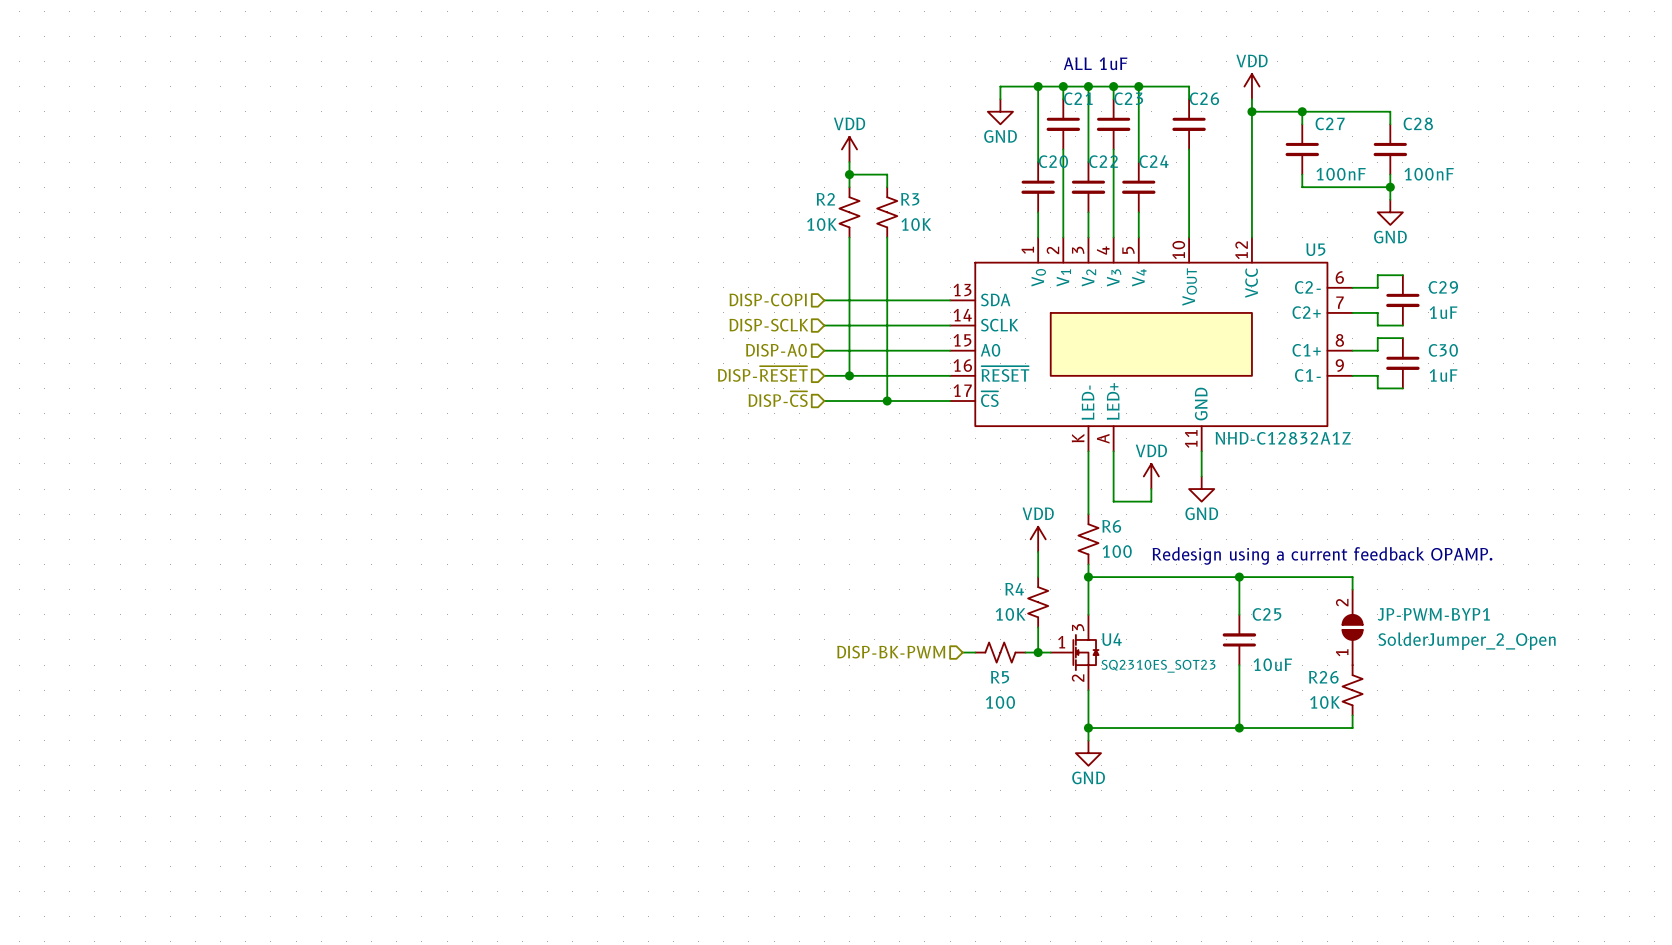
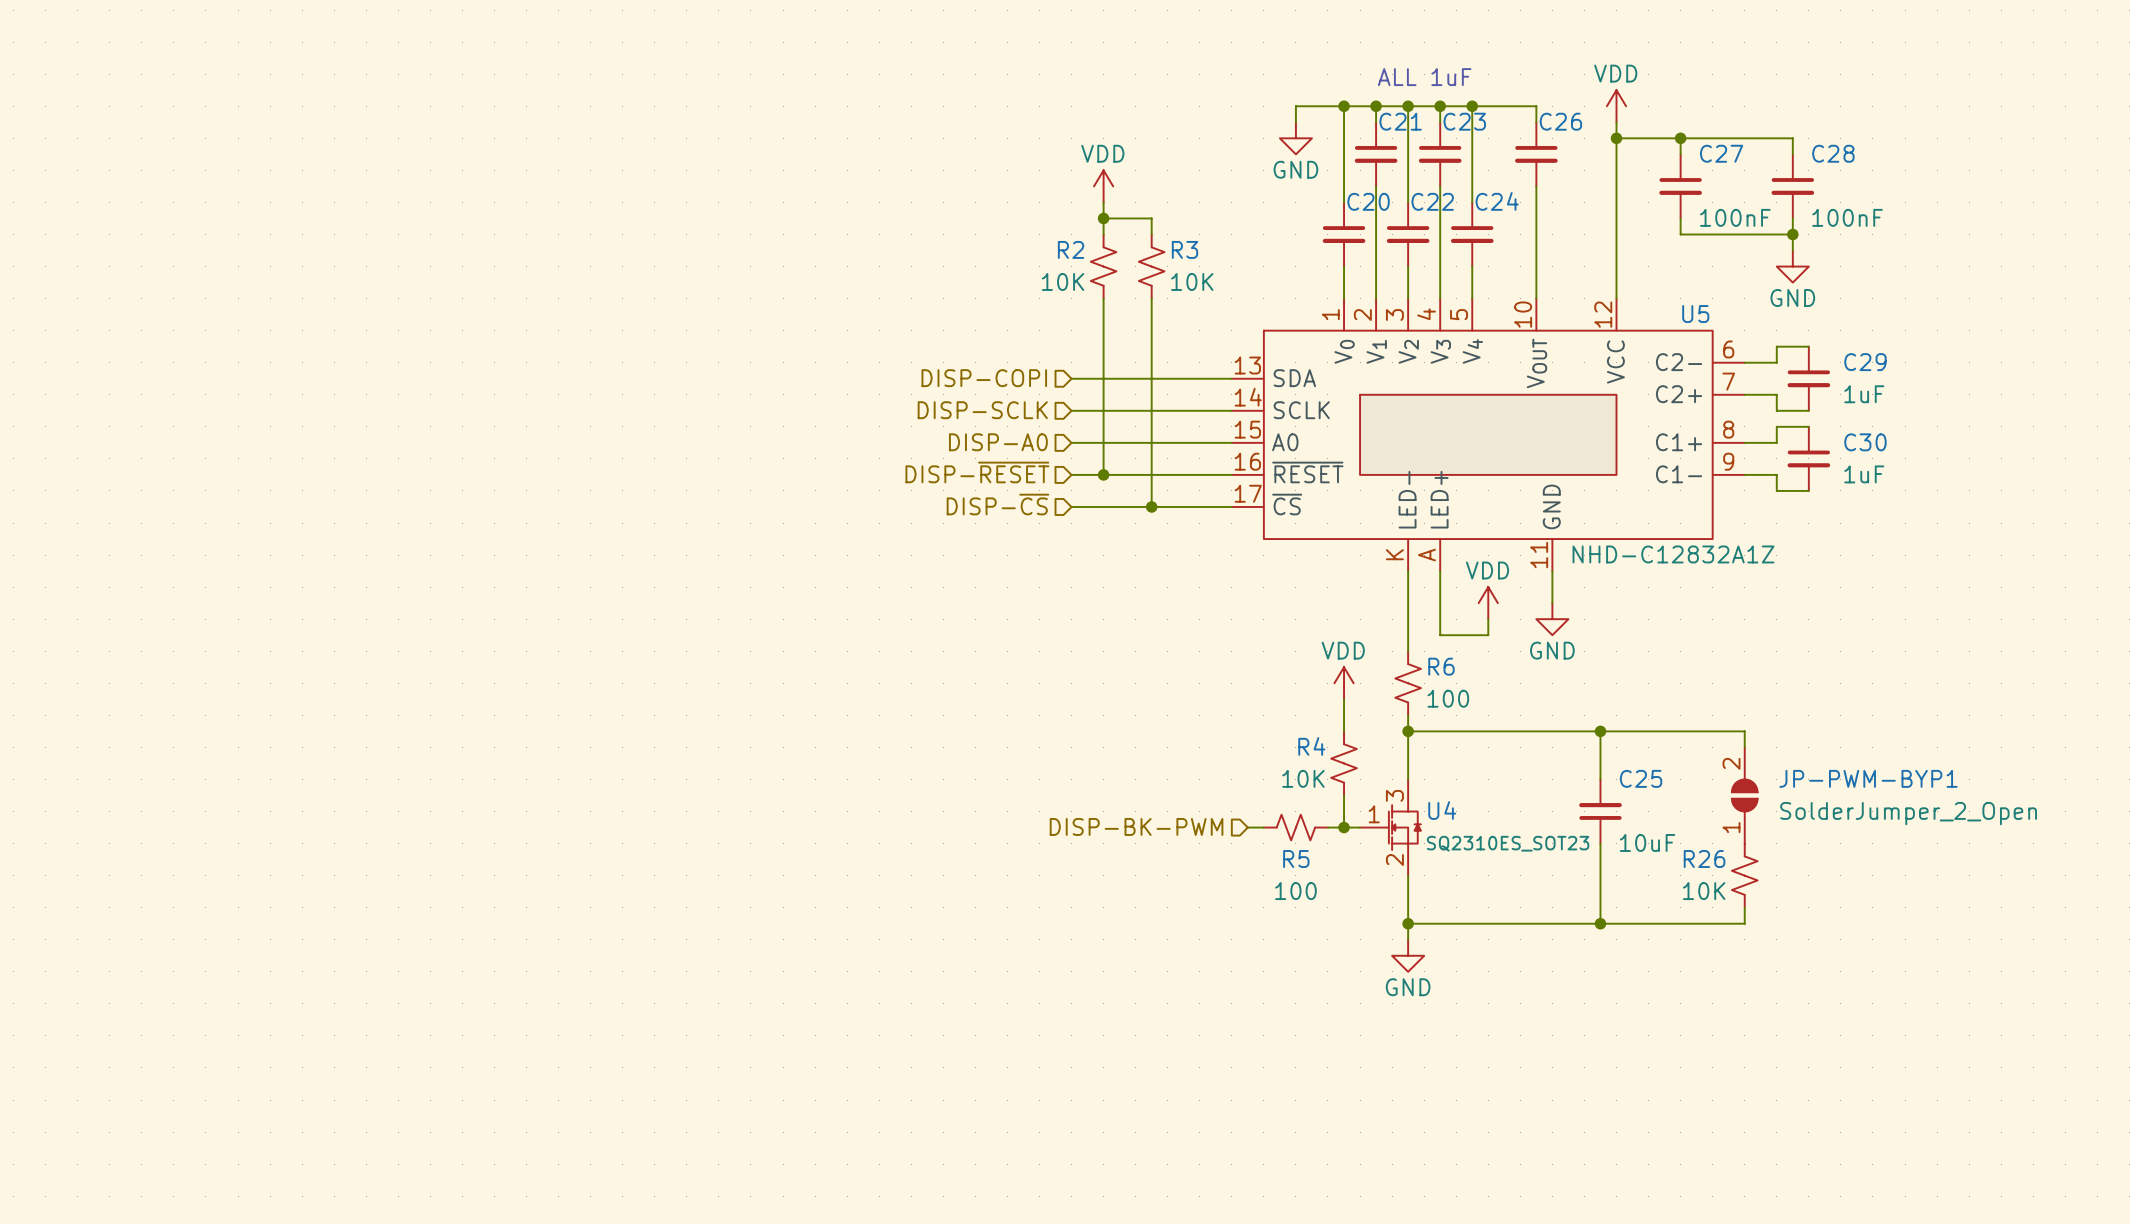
text: Redesign using a current feedback OPAMP. (1322, 555) -> none

